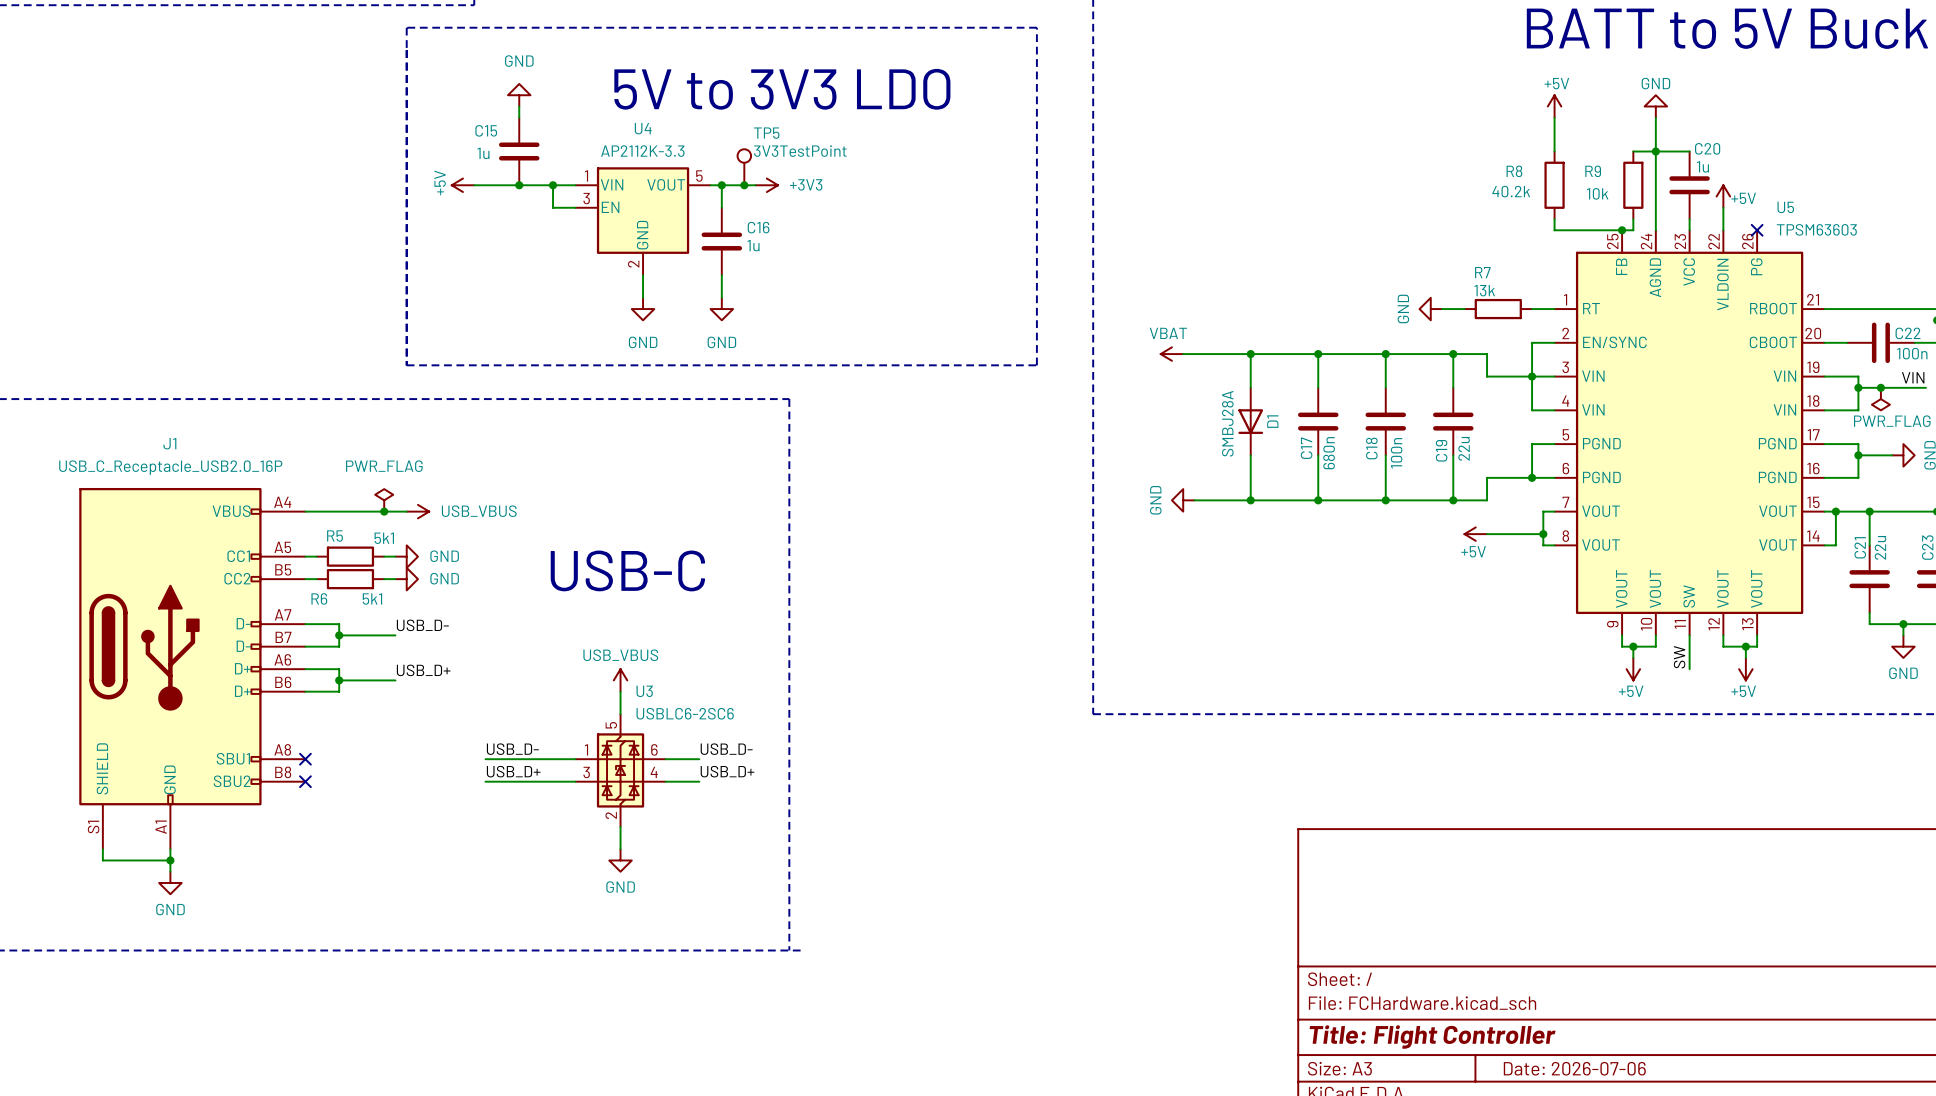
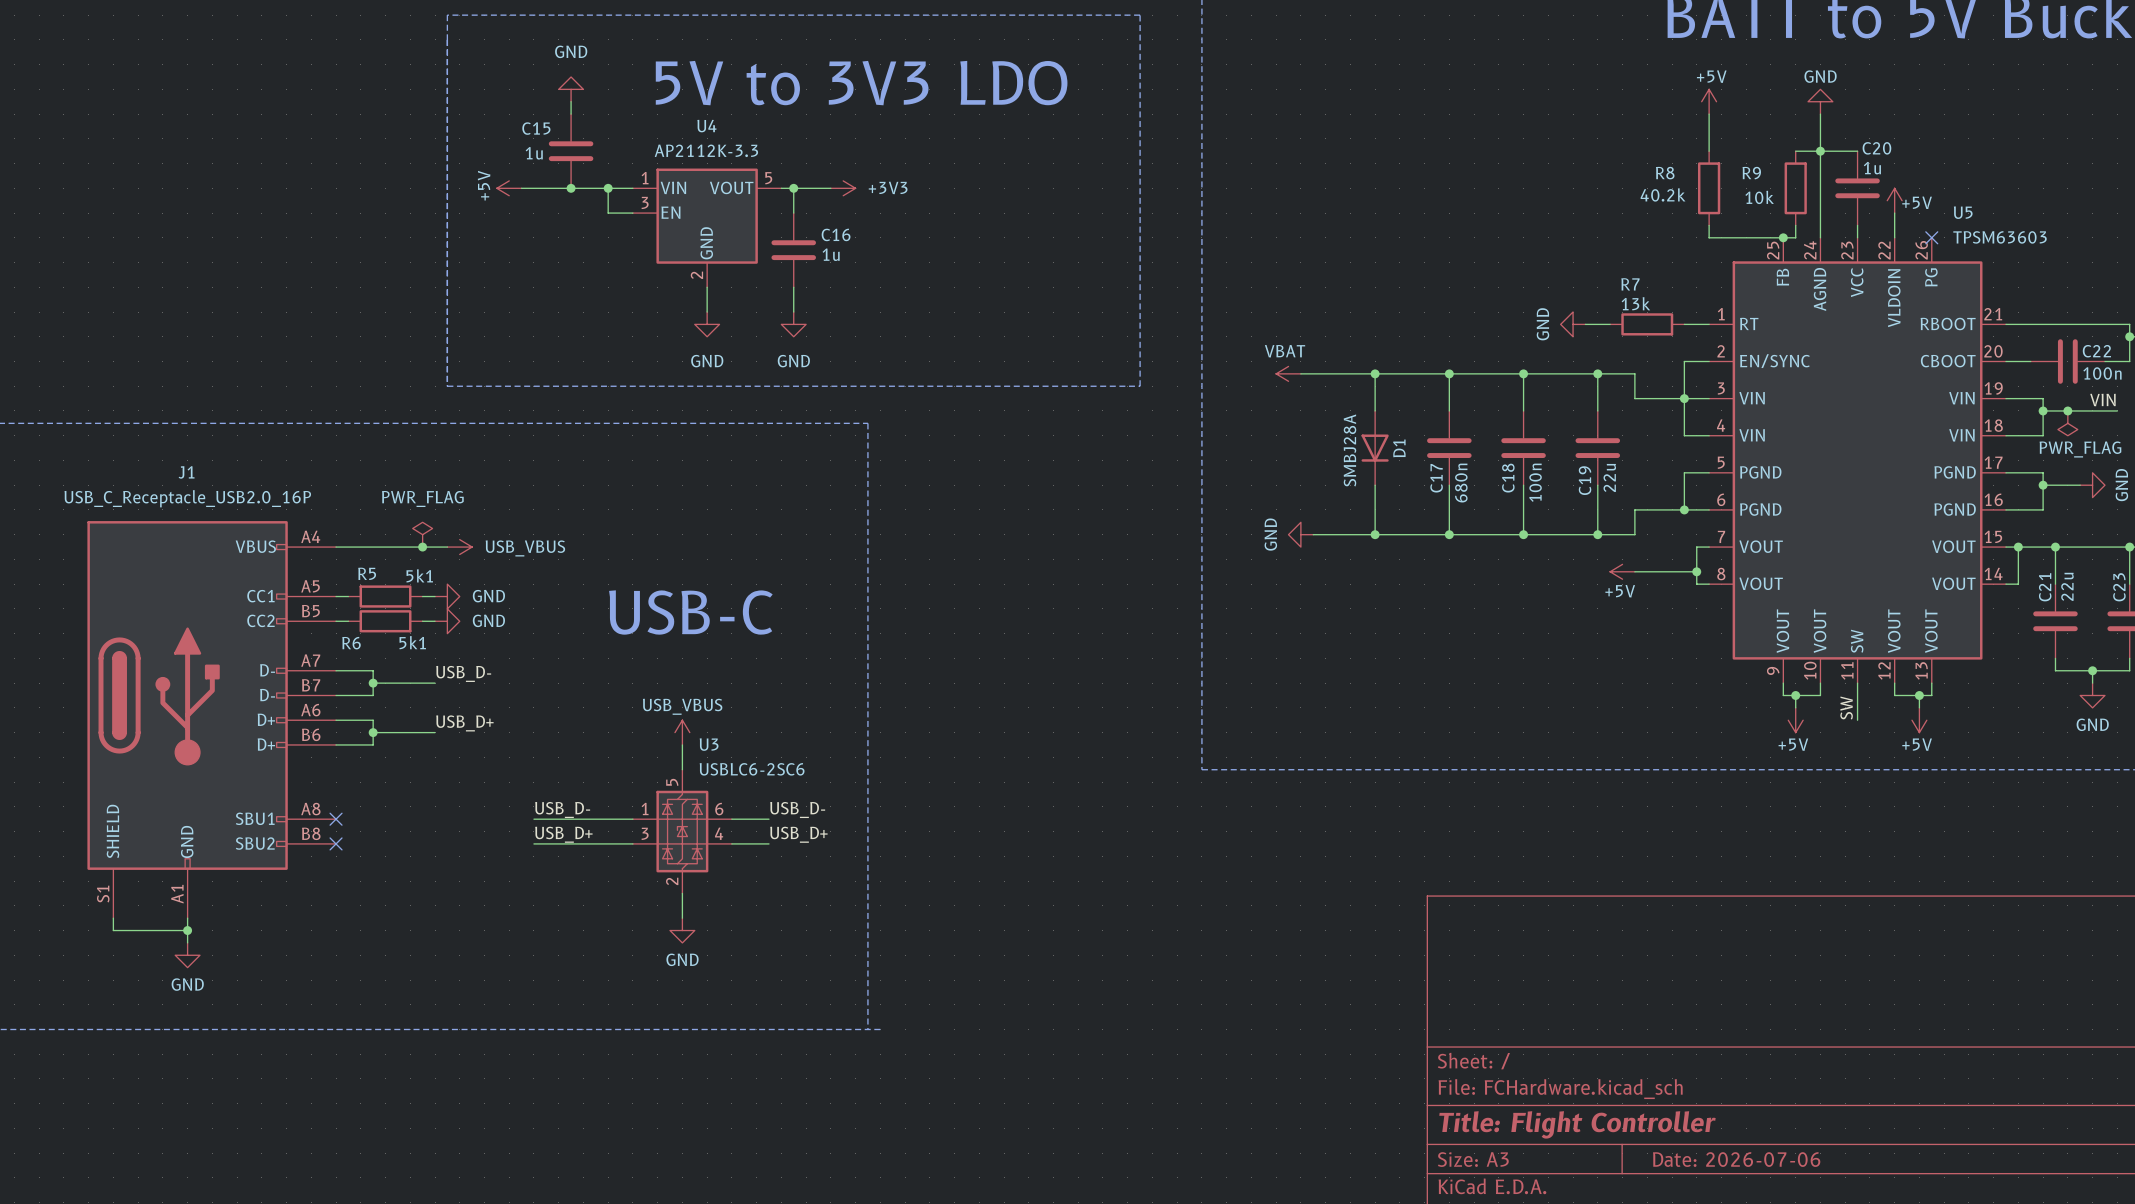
TP5: 3V3TestPoint (744, 167) -> none
junction: (744, 185) -> none

